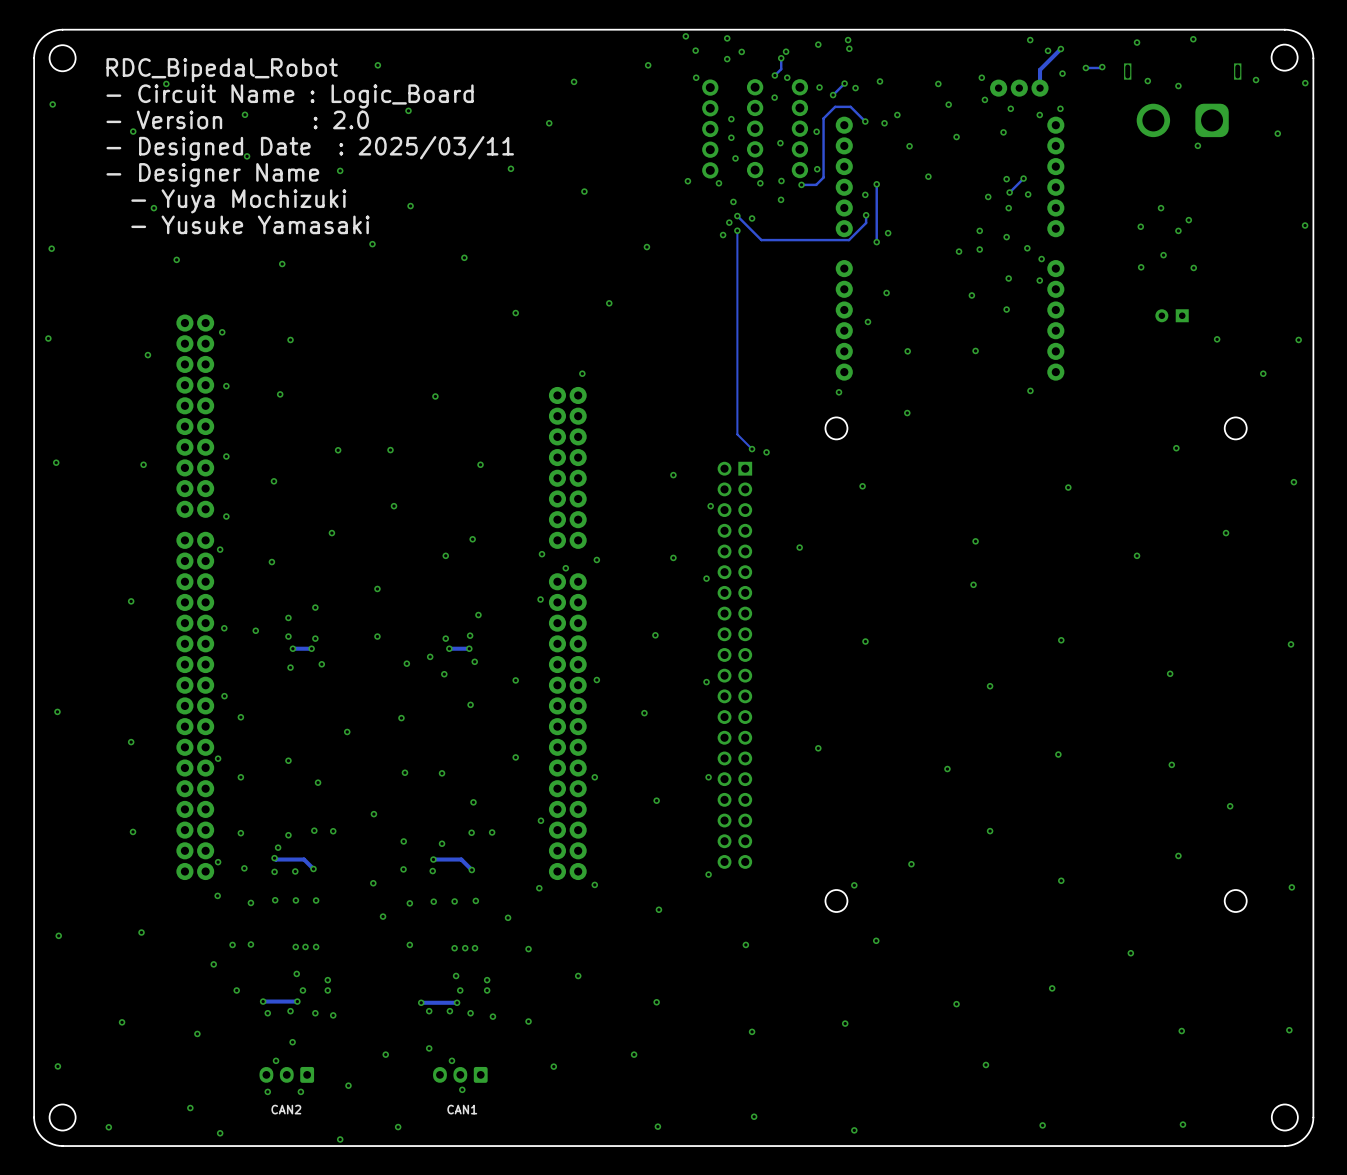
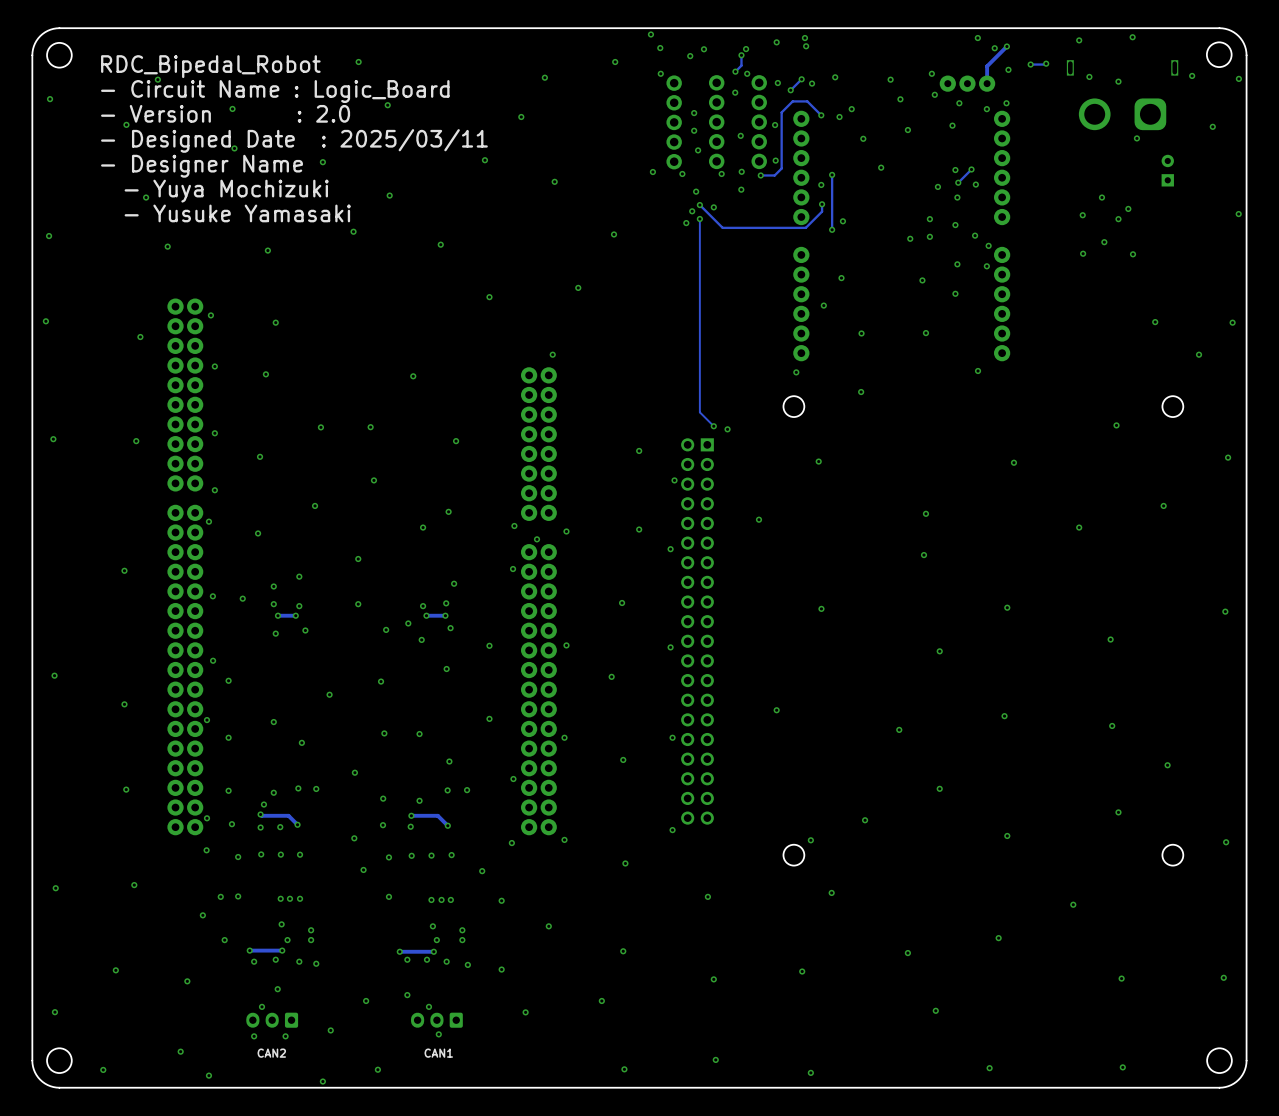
via: (727, 38) -> none
part rotation: 0° (1172, 315) -> 90° clockwise (1167, 170)
part position: (1172, 315) -> (1167, 170)

